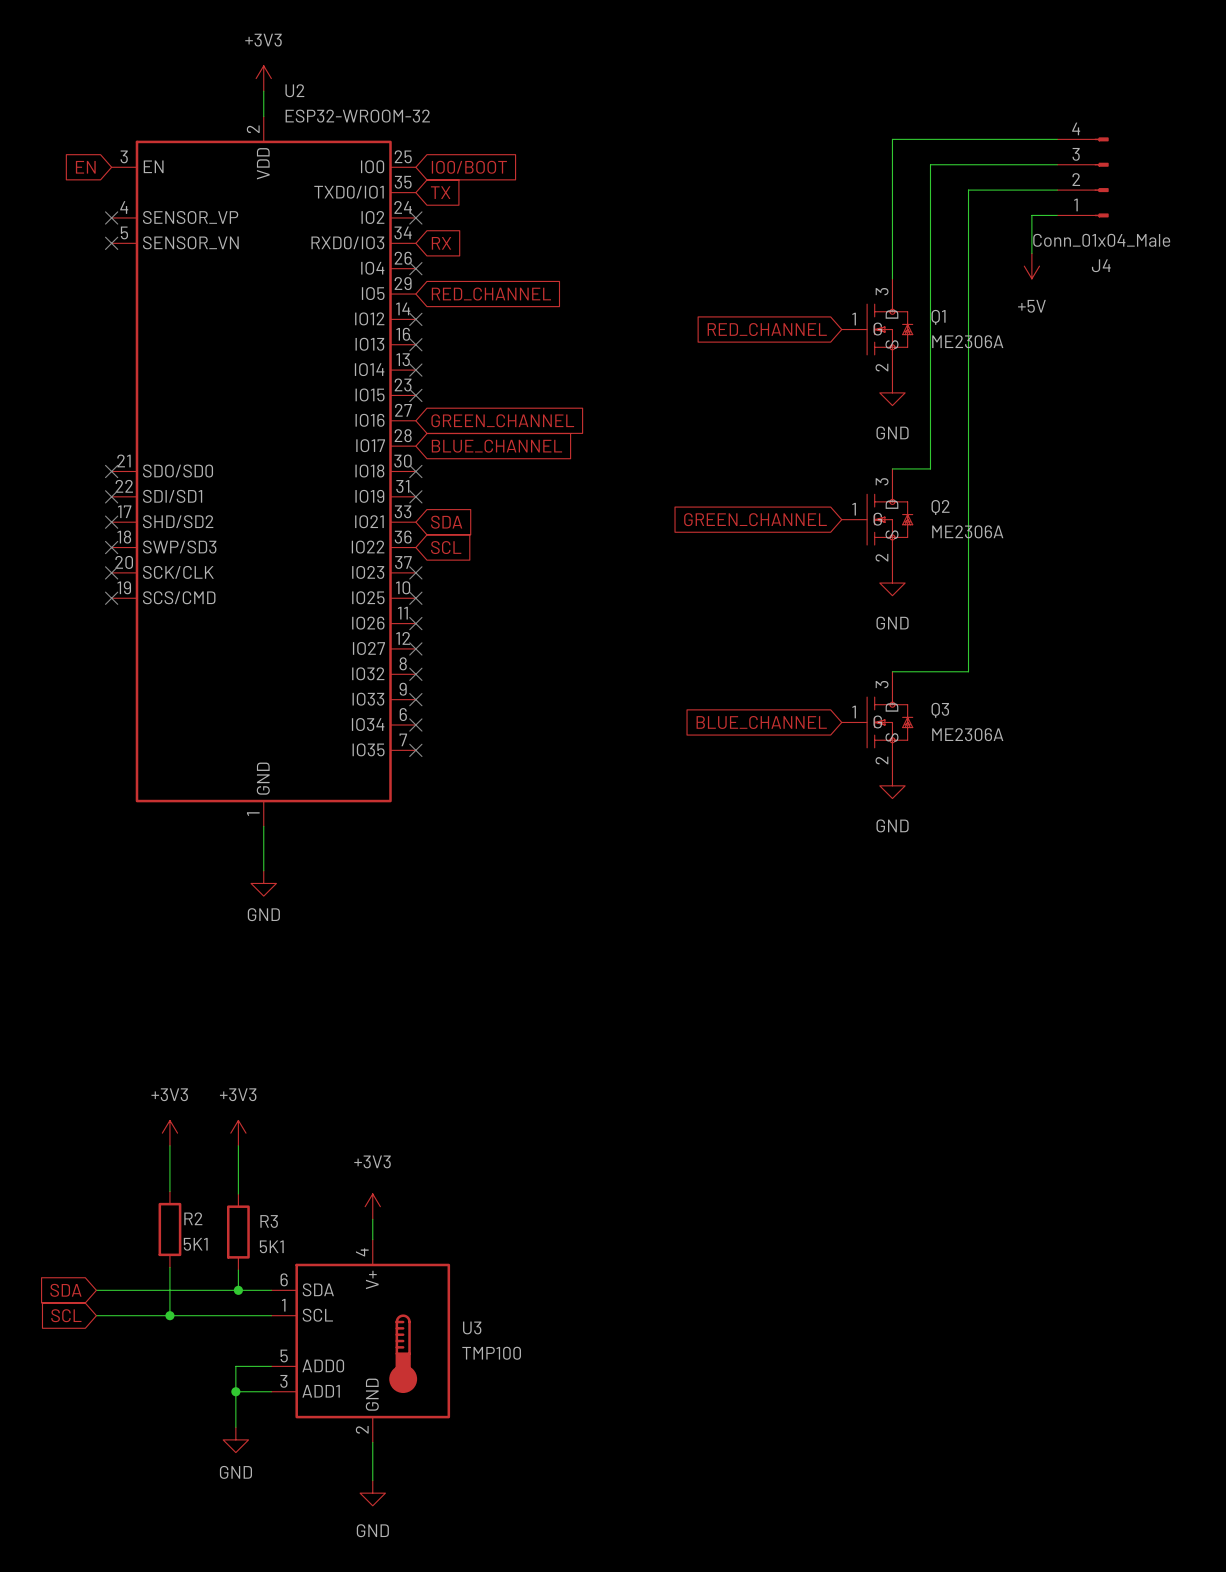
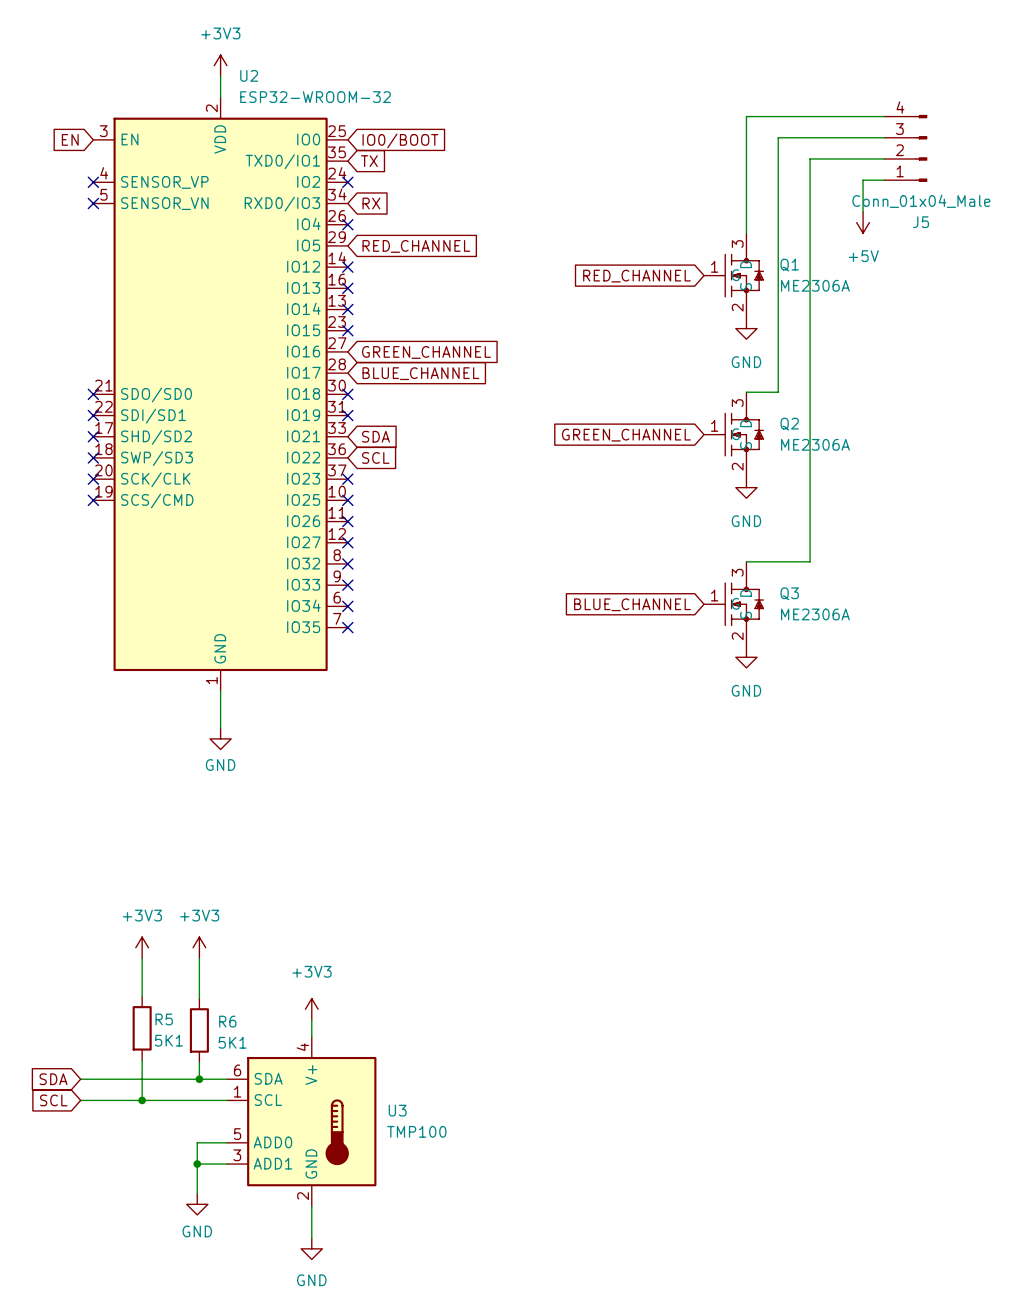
J4 name: J4 (1101, 265) -> J5 (921, 222)
R2 name: R2 (193, 1218) -> R5 (164, 1019)
R3 name: R3 (269, 1221) -> R6 (227, 1021)

